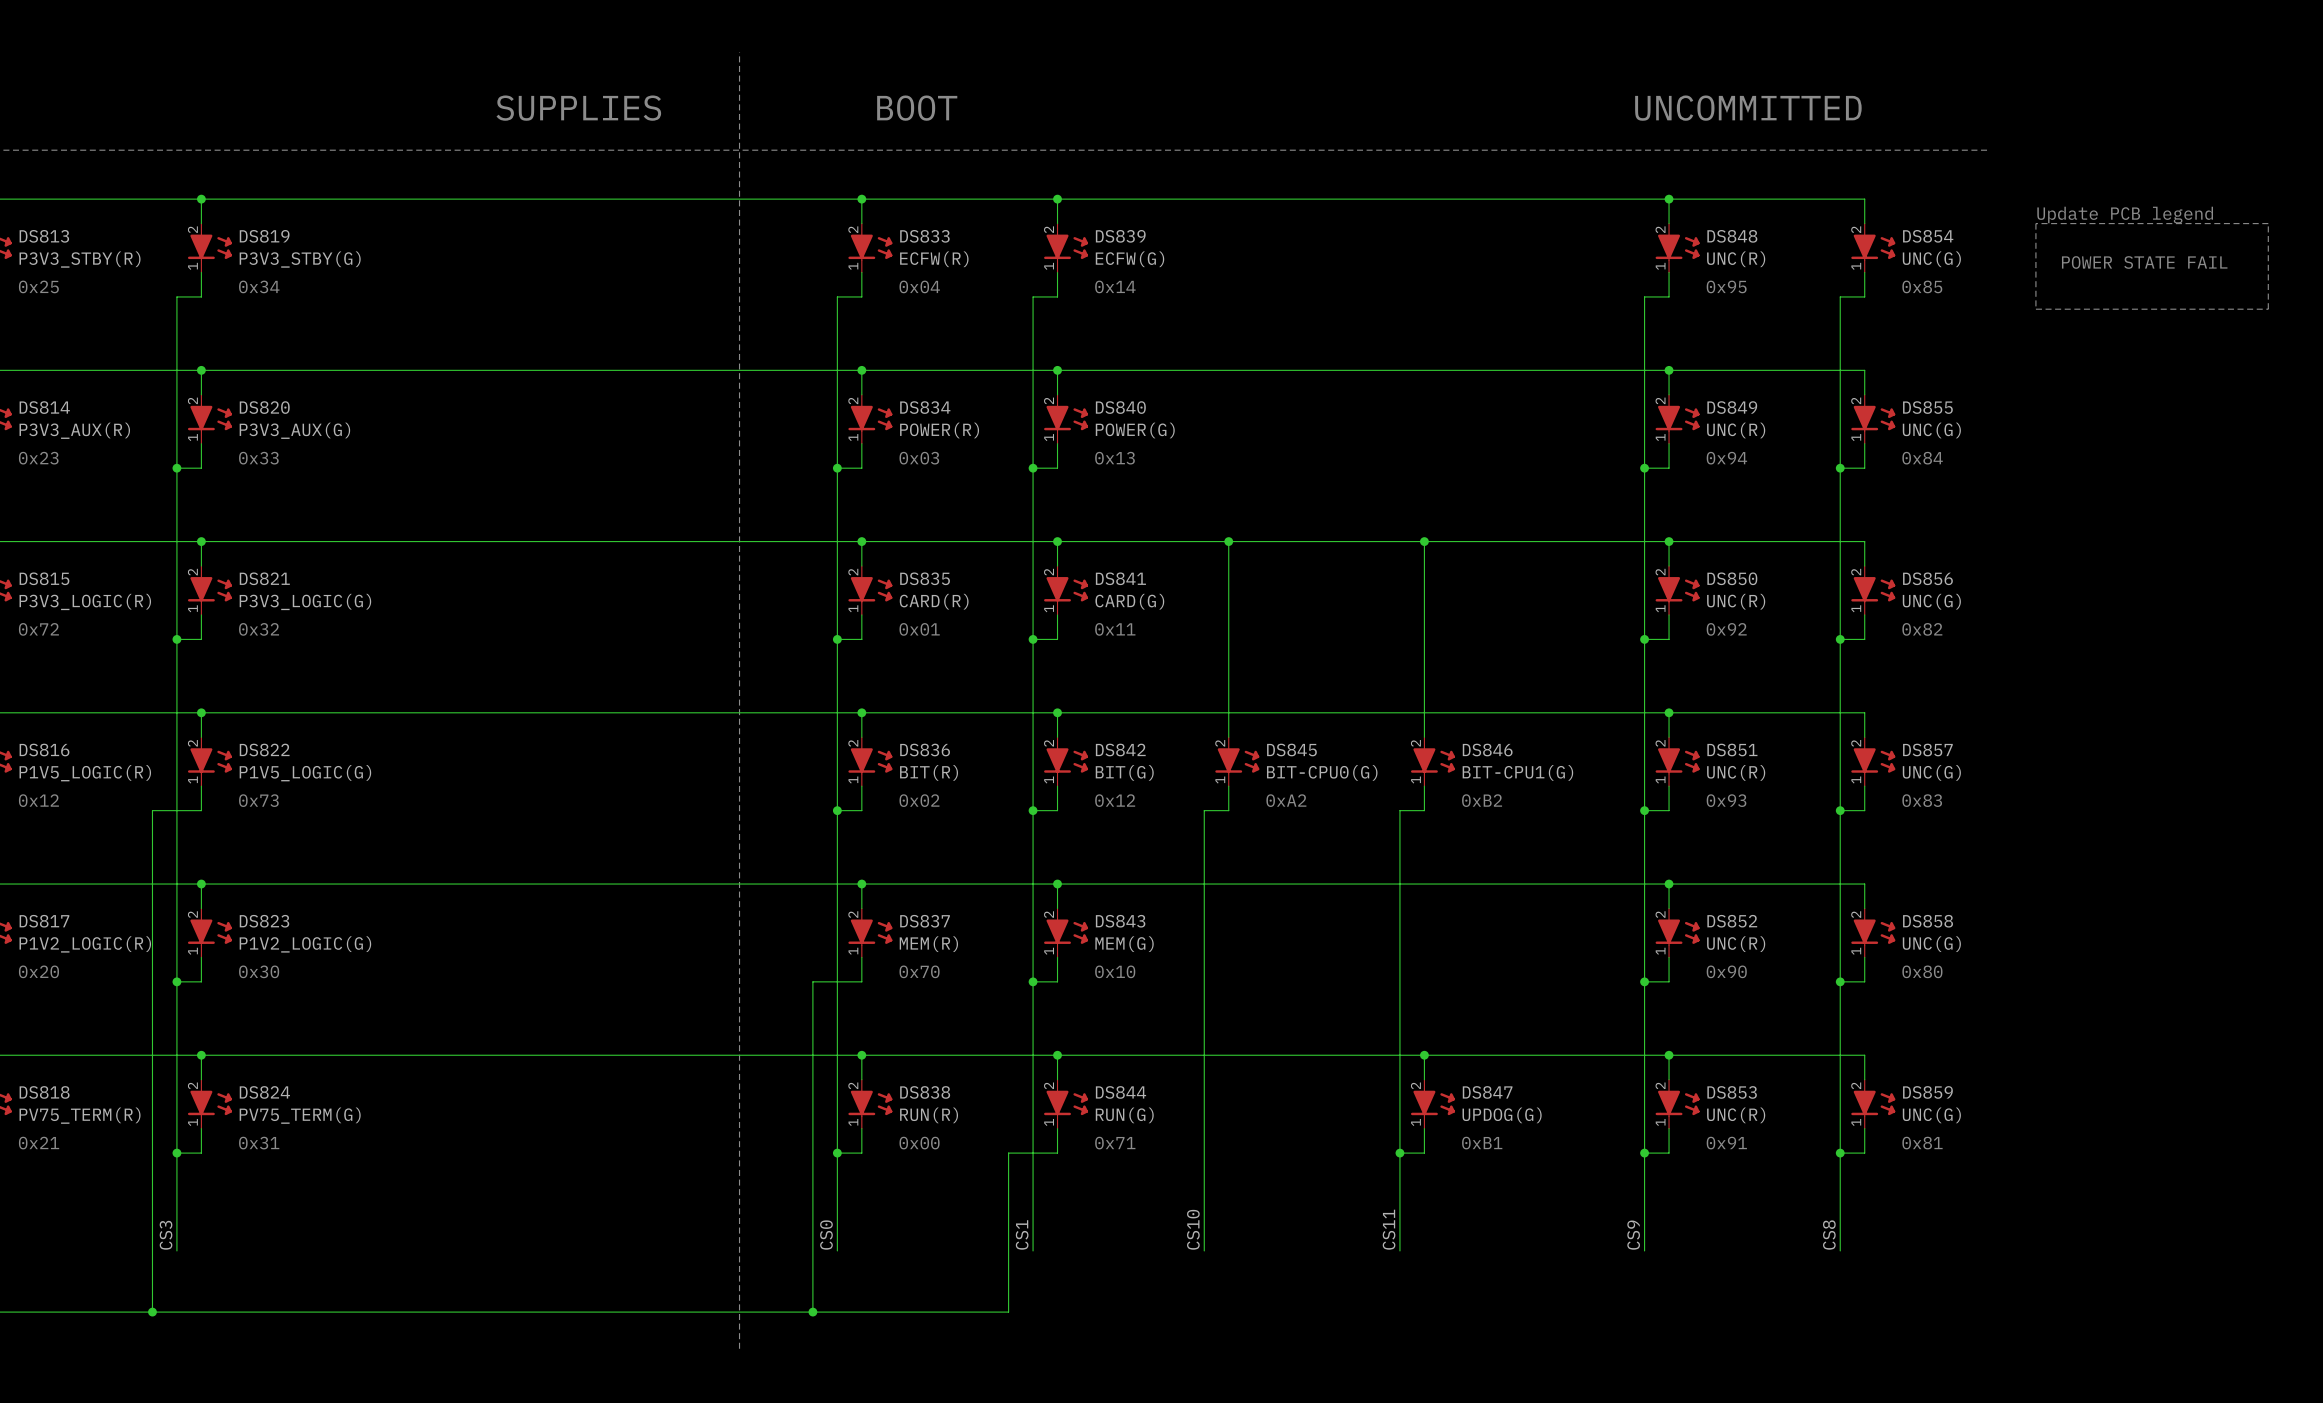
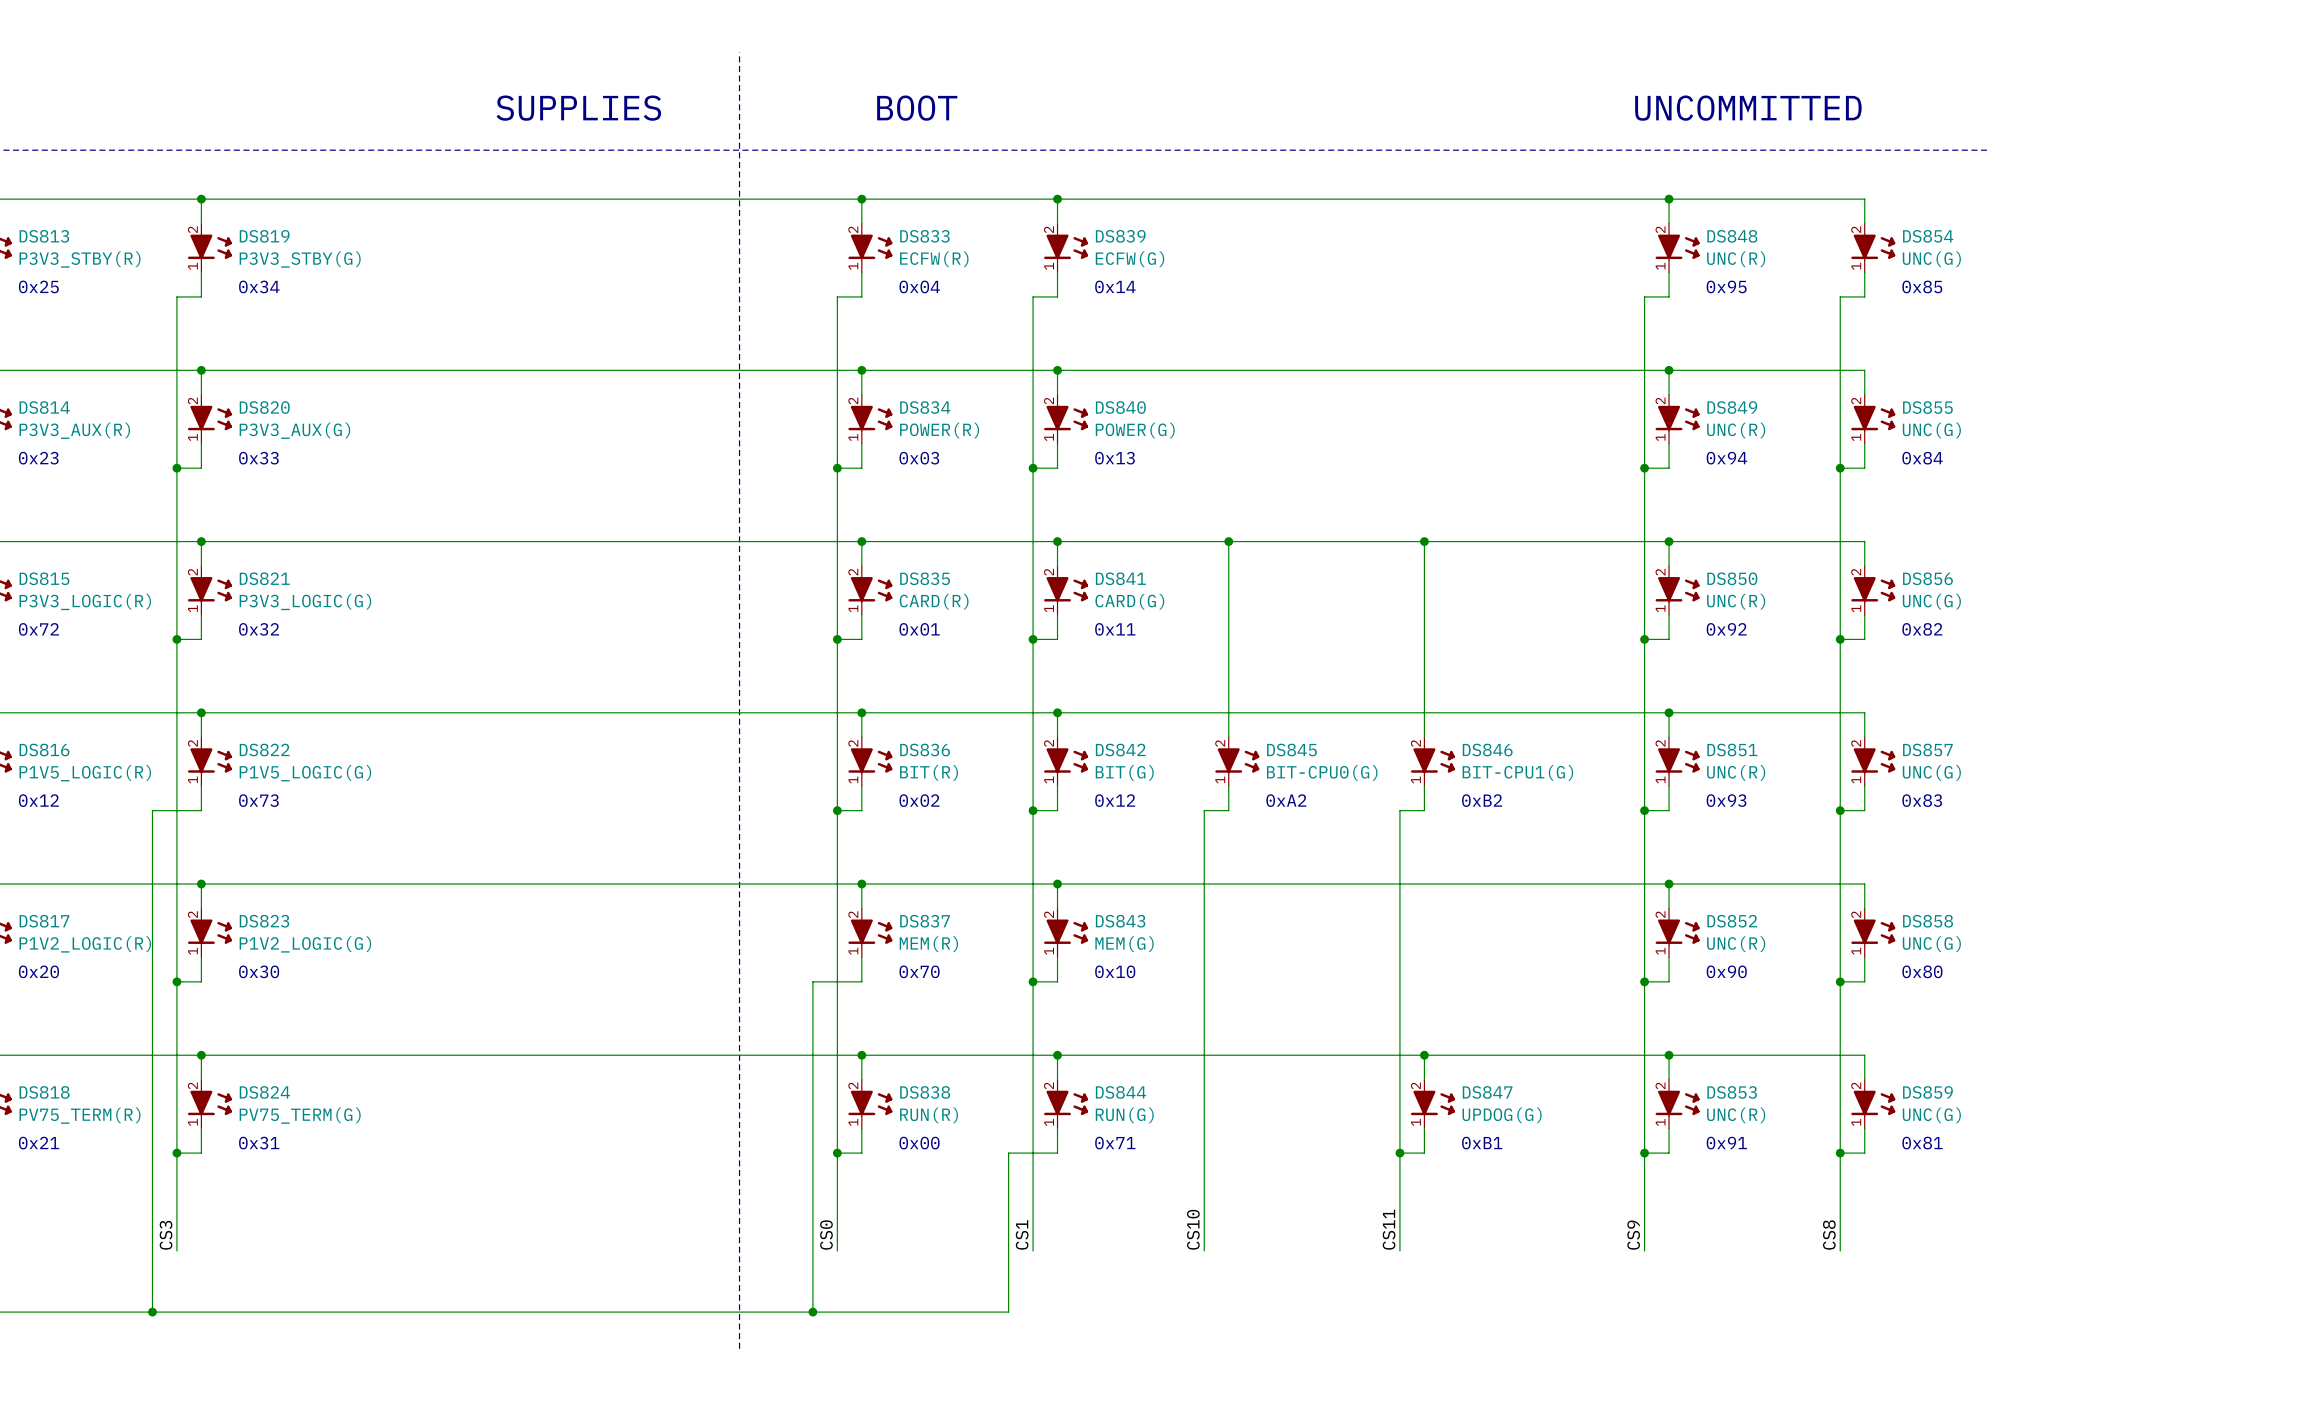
text: Update PCB legend (2125, 215) -> none
line: (2035, 223) (2035, 309) (2268, 309) (2268, 223) (2035, 223) -> none
text: POWER STATE FAIL (2144, 262) -> none

